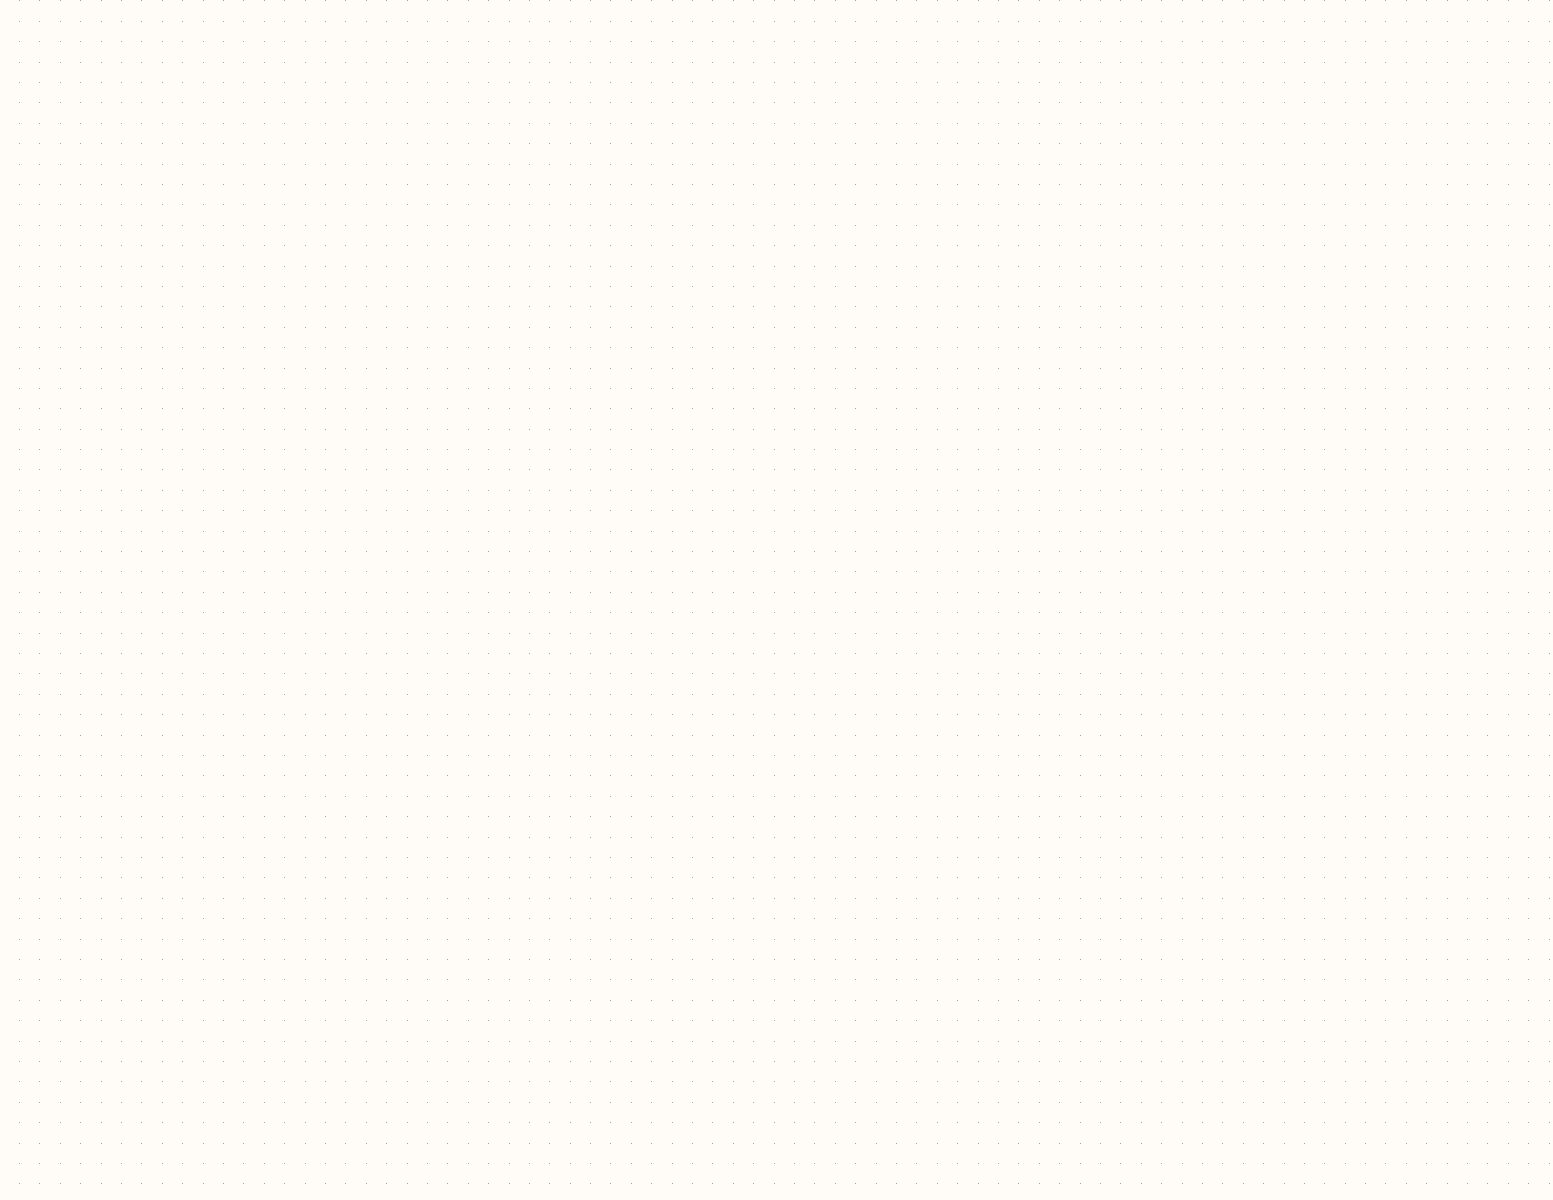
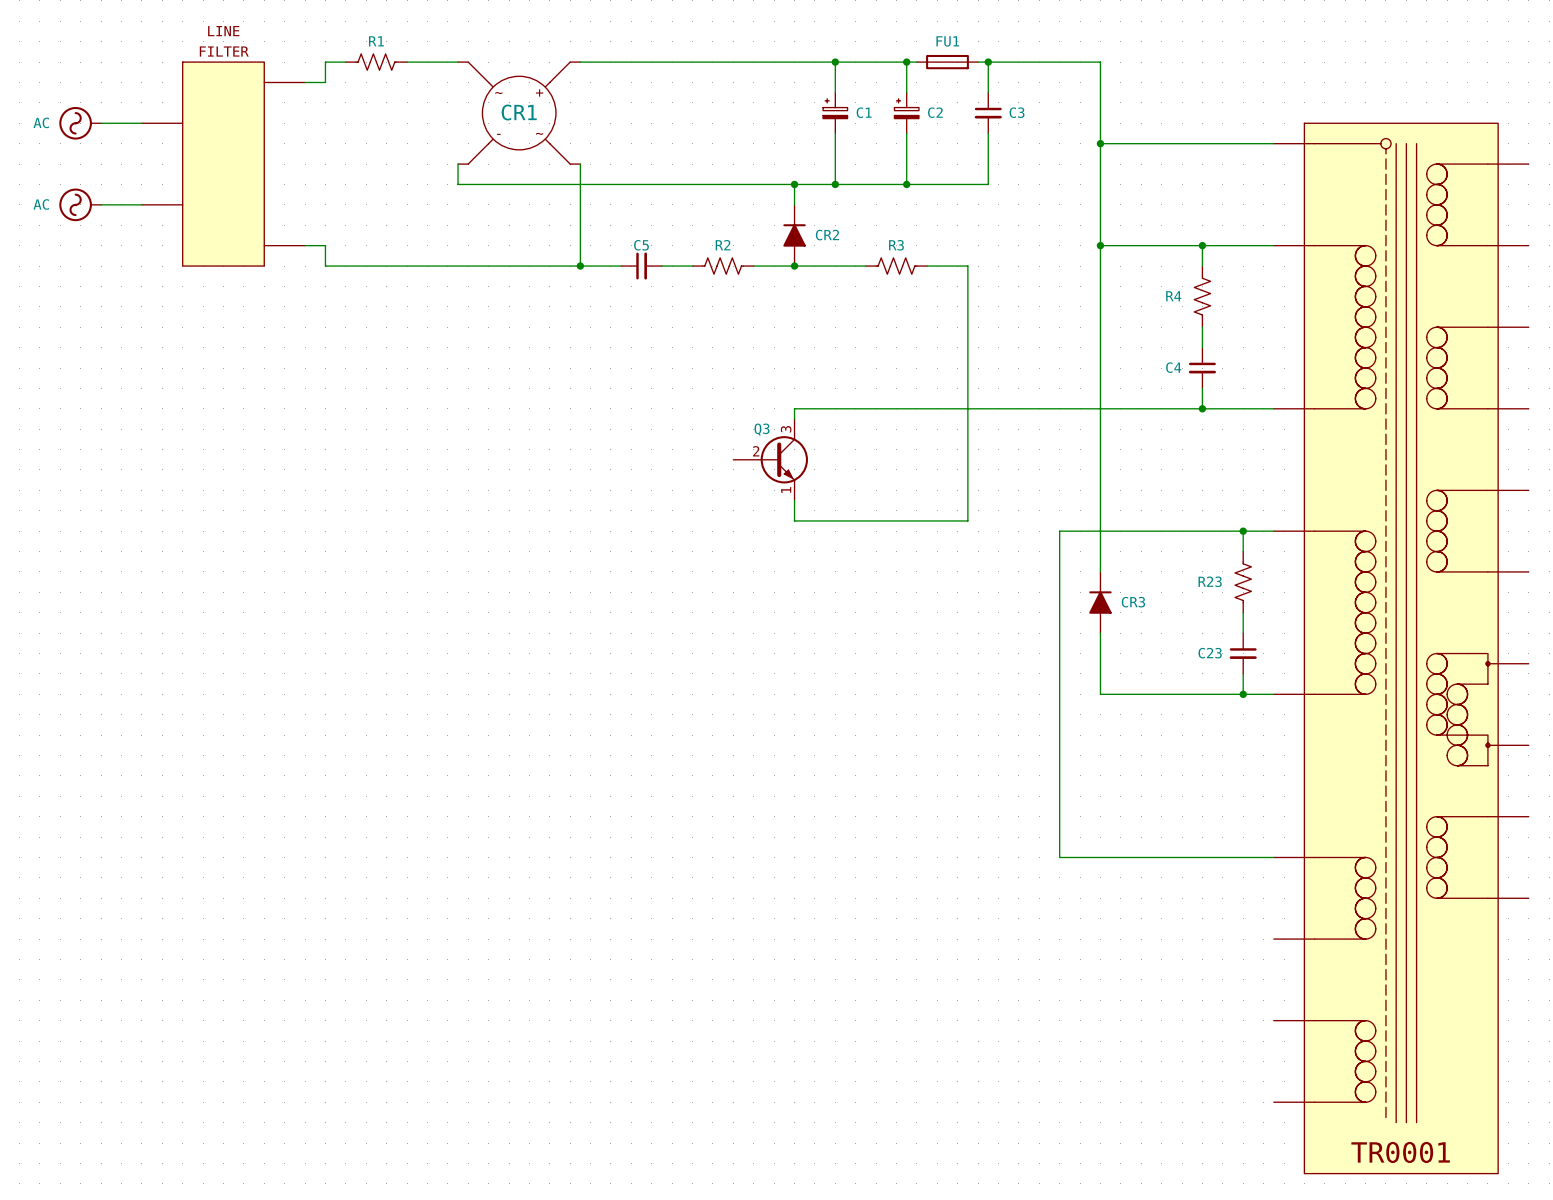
wire: none -> (345, 62) (325, 62) (325, 82) (305, 82)
R1: none -> (376, 62)
wire: none -> (407, 62) (458, 62)
wire: none -> (580, 62) (916, 62)
wire: none -> (835, 62) (835, 92)
junction: none -> (835, 62)
wire: none -> (906, 62) (906, 92)
junction: none -> (906, 62)
FU1: none -> (947, 62)
wire: none -> (978, 62) (1100, 62) (1100, 571)
wire: none -> (988, 62) (988, 92)
junction: none -> (988, 62)
CR1: none -> (519, 113)
C1: none -> (835, 113)
C2: none -> (906, 113)
C3: none -> (988, 113)
power symbol: none -> AC (80, 123)
wire: none -> (101, 123) (141, 123)
wire: none -> (835, 133) (835, 184)
wire: none -> (906, 133) (906, 184)
wire: none -> (988, 133) (988, 184) (458, 184) (458, 164)
wire: none -> (1100, 143) (1273, 143)
junction: none -> (1100, 143)
part: none -> (223, 164)
wire: none -> (580, 164) (580, 266)
wire: none -> (794, 184) (794, 204)
junction: none -> (794, 184)
junction: none -> (835, 184)
junction: none -> (906, 184)
power symbol: none -> AC (80, 204)
wire: none -> (101, 204) (141, 204)
CR2: none -> (794, 235)
wire: none -> (305, 245) (325, 245) (325, 266) (621, 266)
wire: none -> (1100, 245) (1273, 245)
junction: none -> (1100, 245)
wire: none -> (1202, 245) (1202, 266)
junction: none -> (1202, 245)
junction: none -> (580, 266)
C5: none -> (641, 266)
wire: none -> (661, 266) (692, 266)
R2: none -> (723, 266)
wire: none -> (753, 266) (865, 266)
junction: none -> (794, 266)
R3: none -> (896, 266)
wire: none -> (927, 266) (967, 266) (967, 520) (794, 520) (794, 500)
R4: none -> (1202, 296)
wire: none -> (1202, 327) (1202, 347)
C4: none -> (1202, 368)
wire: none -> (1202, 388) (1202, 408)
junction: none -> (1202, 408)
wire: none -> (1273, 408) (794, 408) (794, 419)
Q3: none -> (770, 459)
wire: none -> (1243, 531) (1243, 551)
junction: none -> (1243, 531)
wire: none -> (1273, 531) (1059, 531) (1059, 857) (1273, 857)
R23: none -> (1243, 582)
CR3: none -> (1100, 602)
wire: none -> (1243, 612) (1243, 633)
wire: none -> (1100, 633) (1100, 694) (1273, 694)
part: none -> (1401, 648)
C23: none -> (1243, 653)
wire: none -> (1243, 673) (1243, 694)
junction: none -> (1243, 694)

